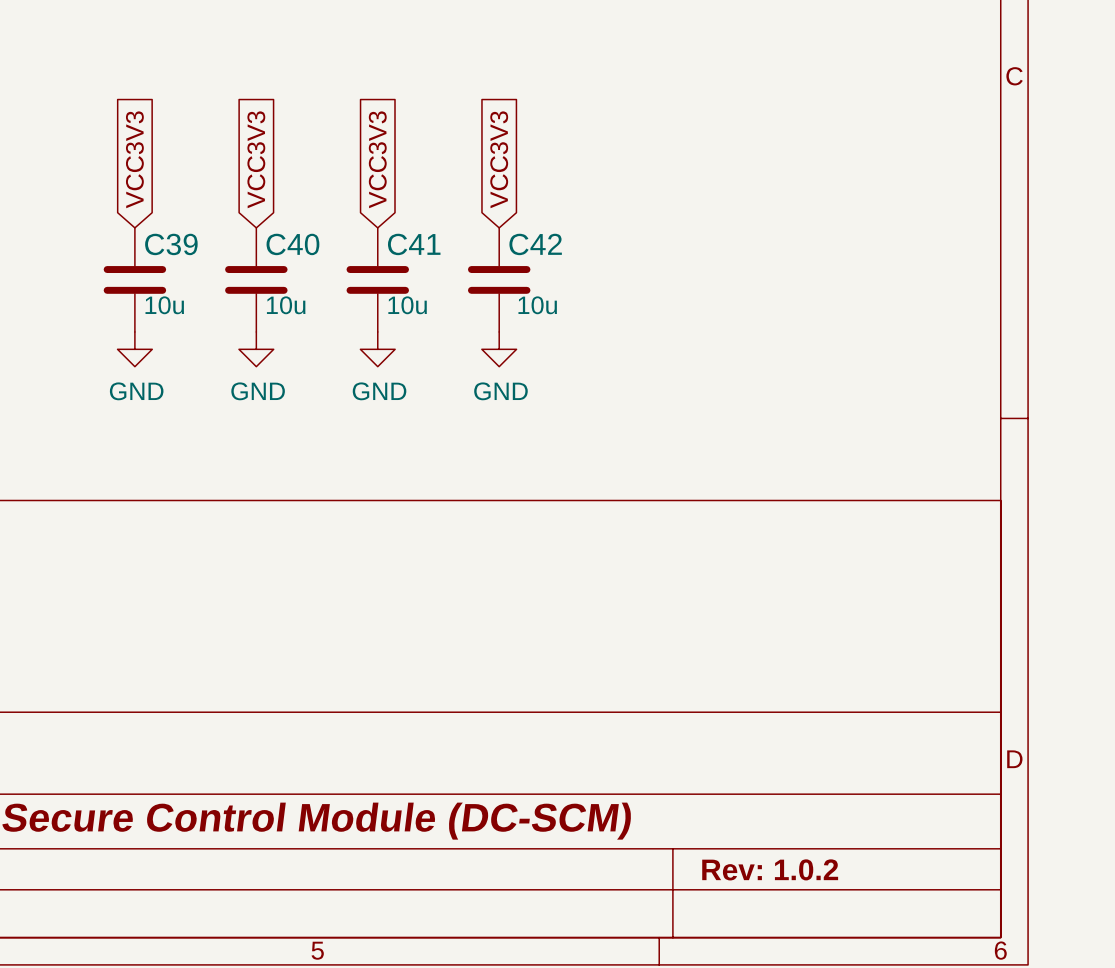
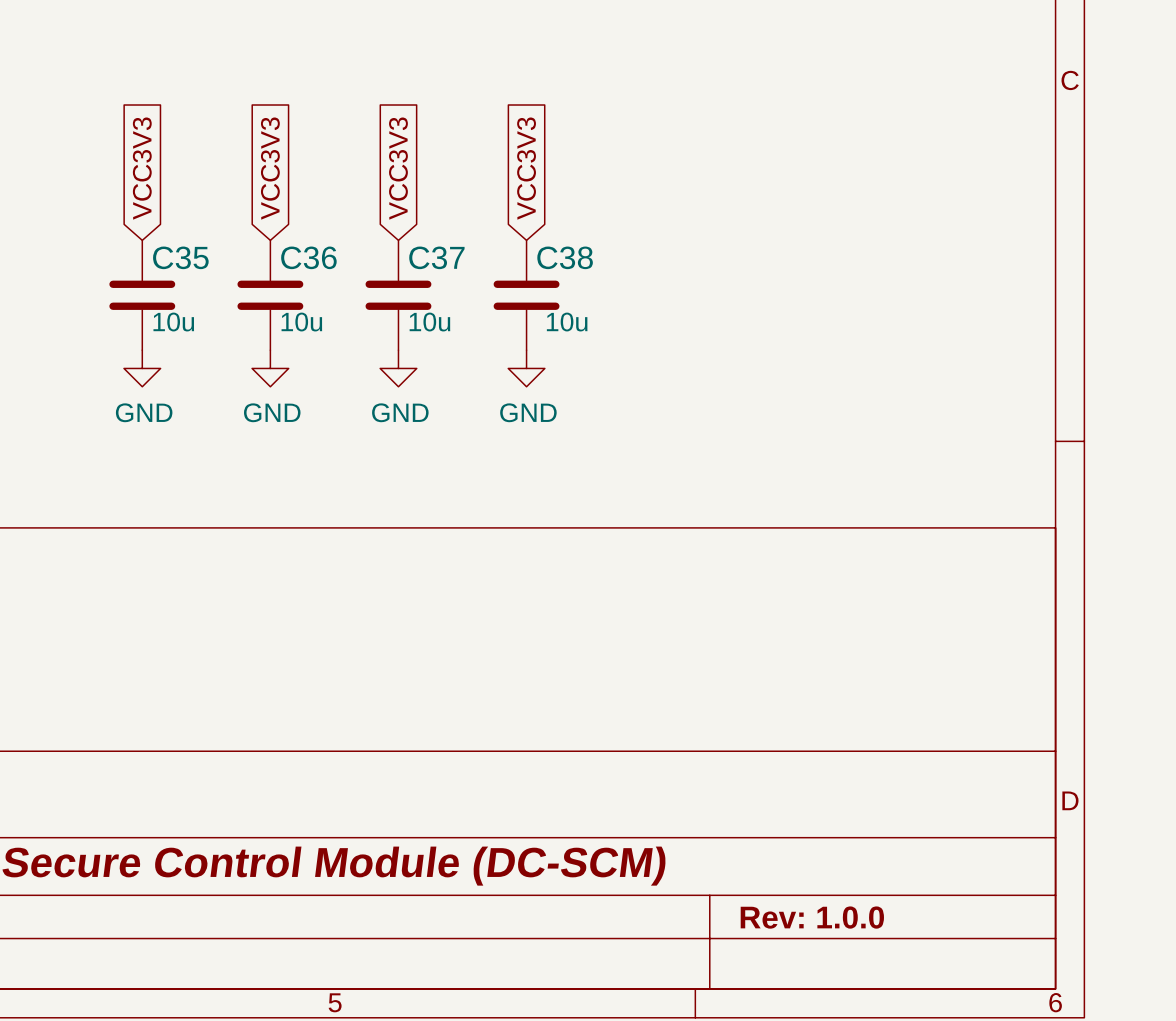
C39 name: C39 (171, 244) -> C35 (180, 257)
C40 name: C40 (292, 244) -> C36 (308, 257)
C41 name: C41 (414, 244) -> C37 (436, 257)
C42 name: C42 (535, 244) -> C38 (565, 257)
title block: Rev: 1.0.2 (770, 869) -> Rev: 1.0.0 (812, 917)

